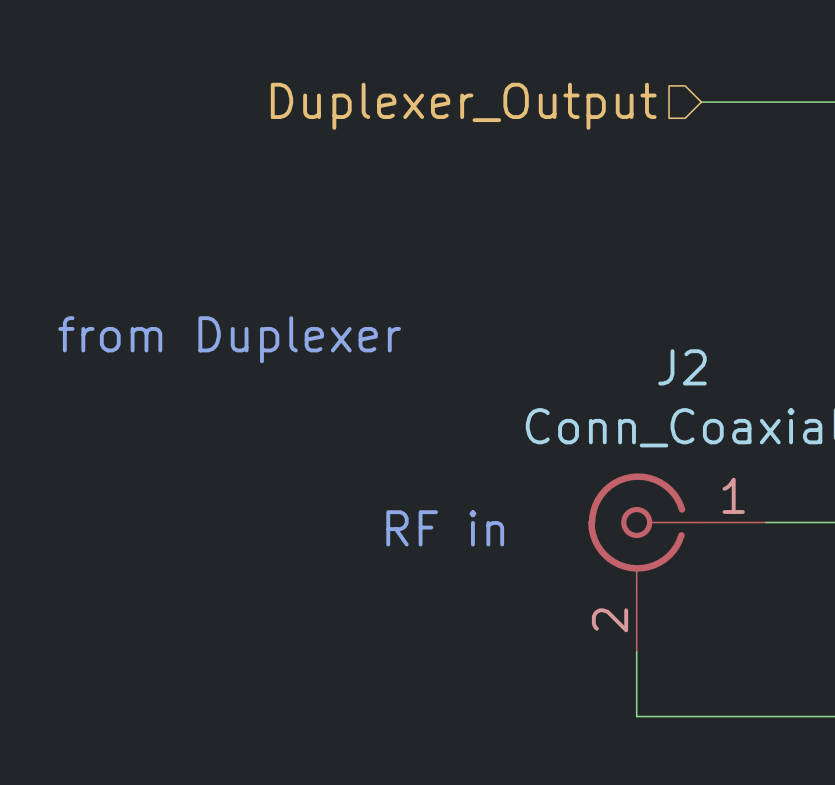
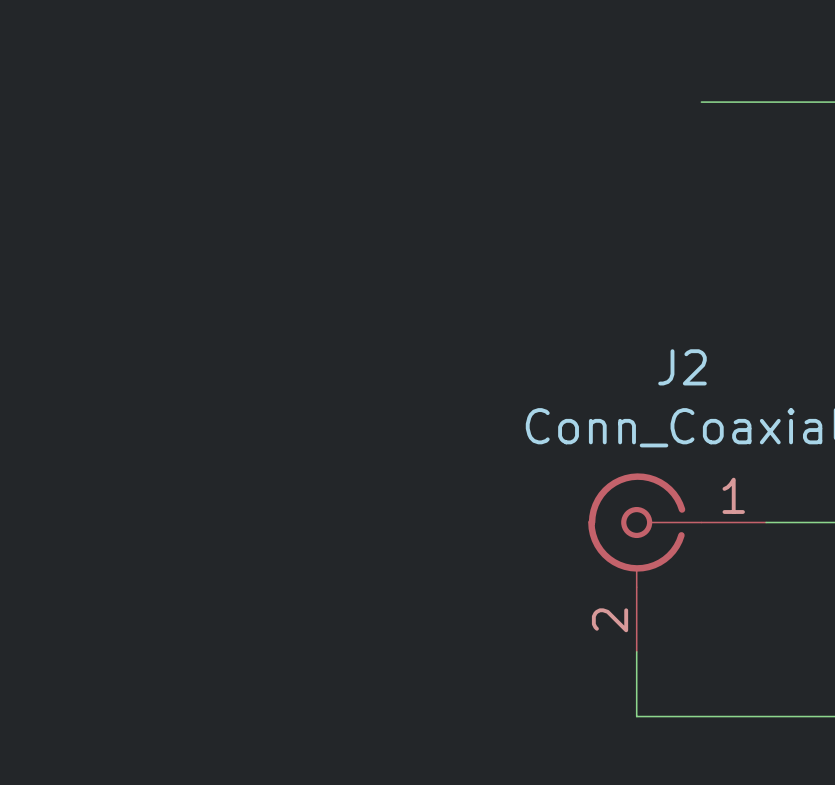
hierarchical label: Duplexer_Output (463, 106) -> none
text: from Duplexer (229, 339) -> none
text: RF in (445, 528) -> none

